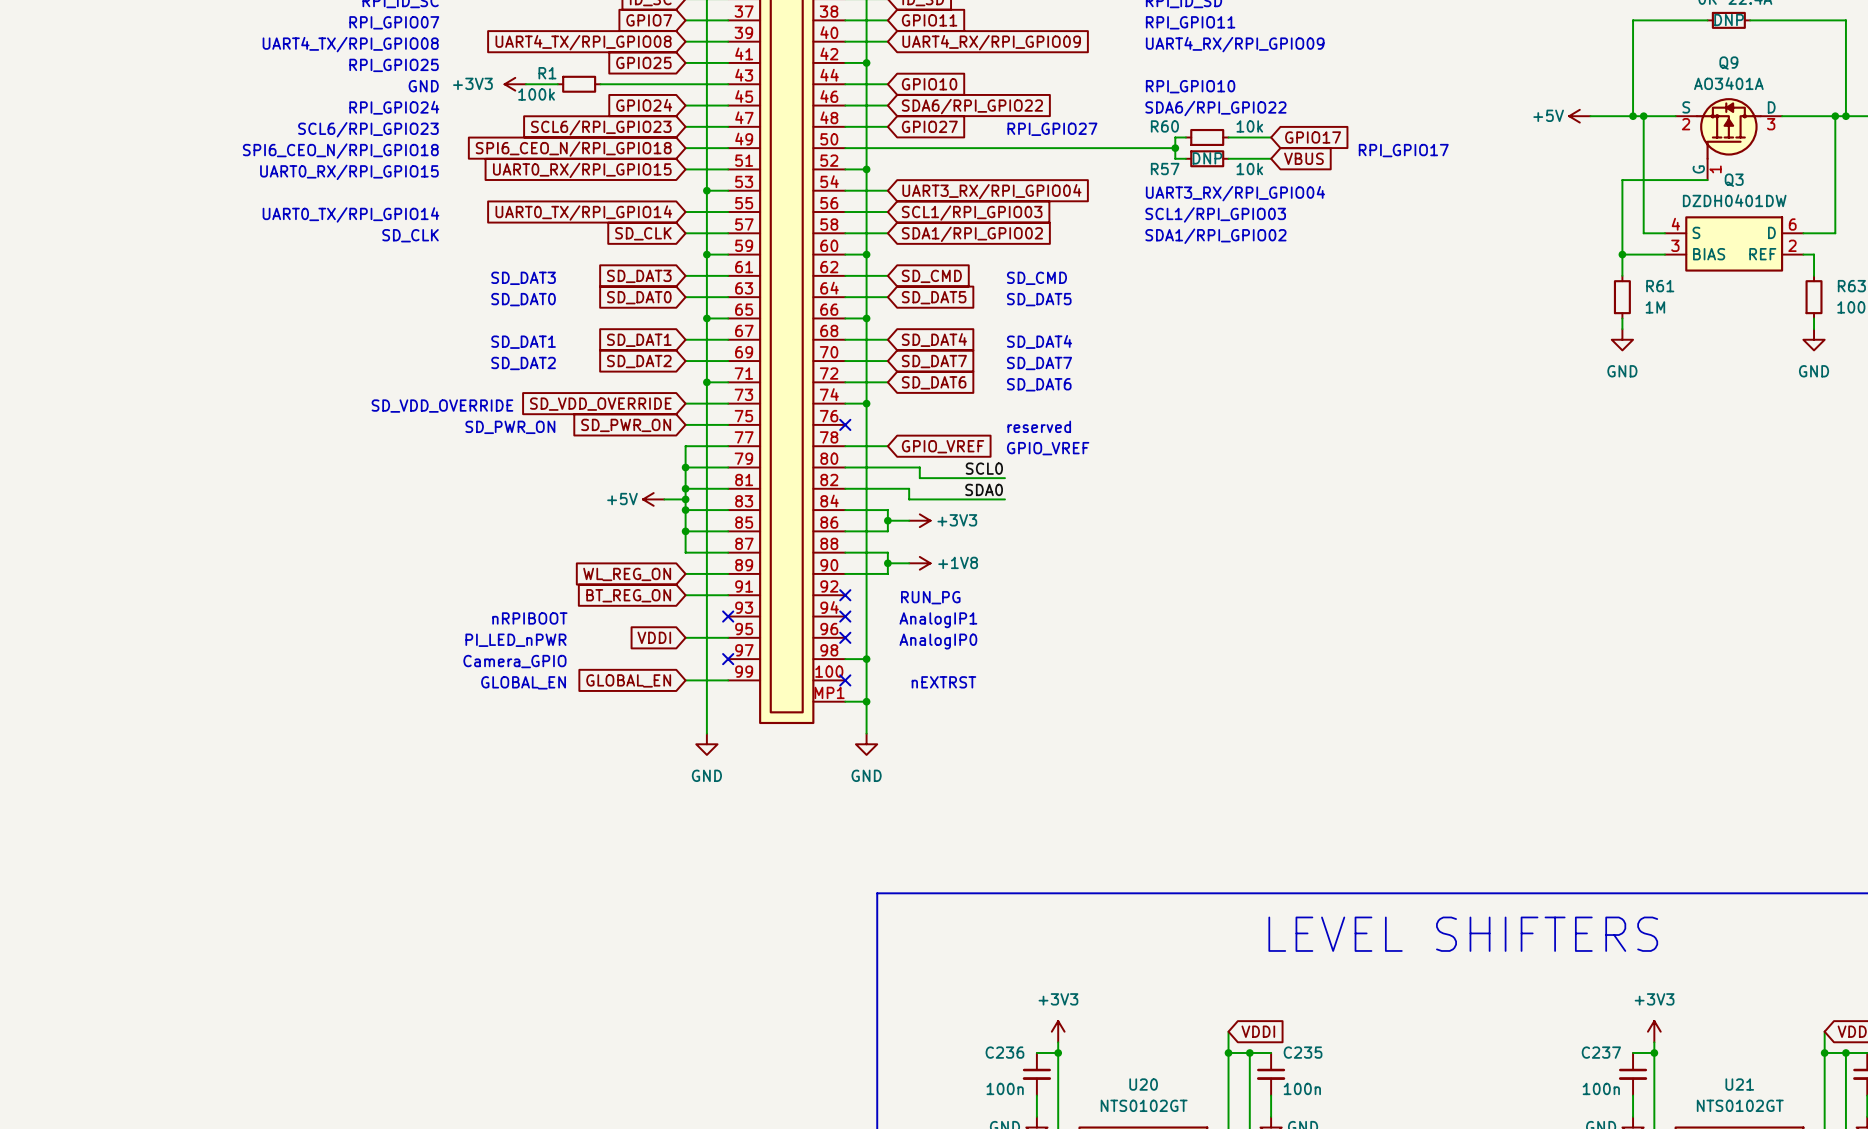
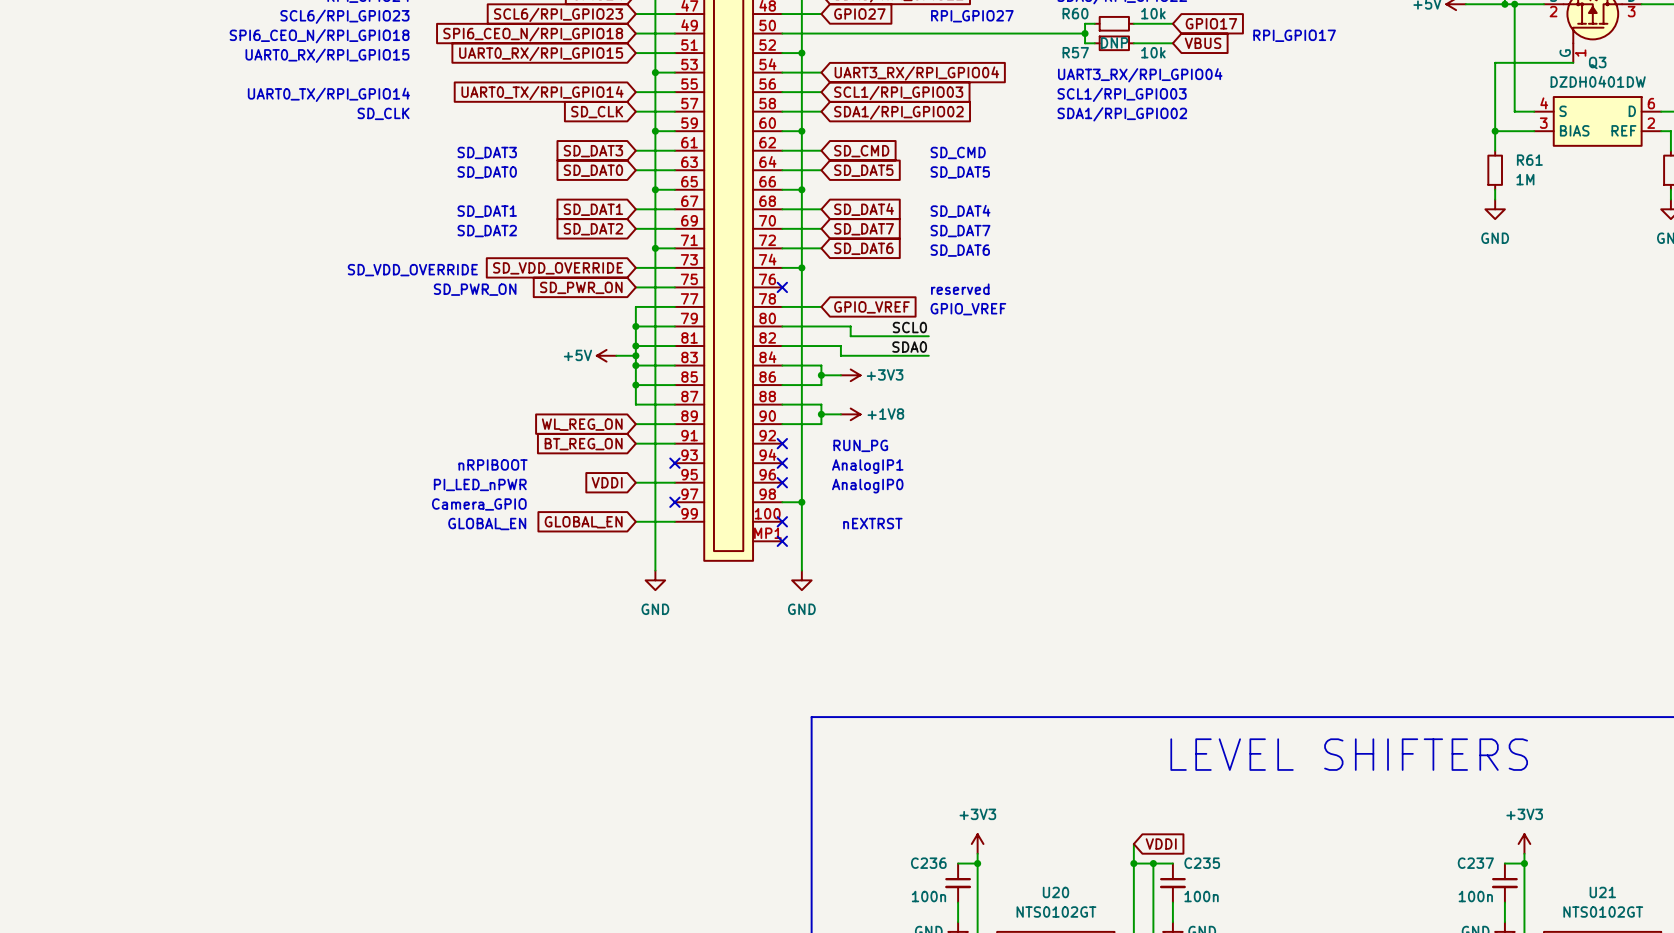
wire: (845, 701) (866, 701) -> none
no-connect mark: none -> (782, 541)
junction: (866, 701) -> none

